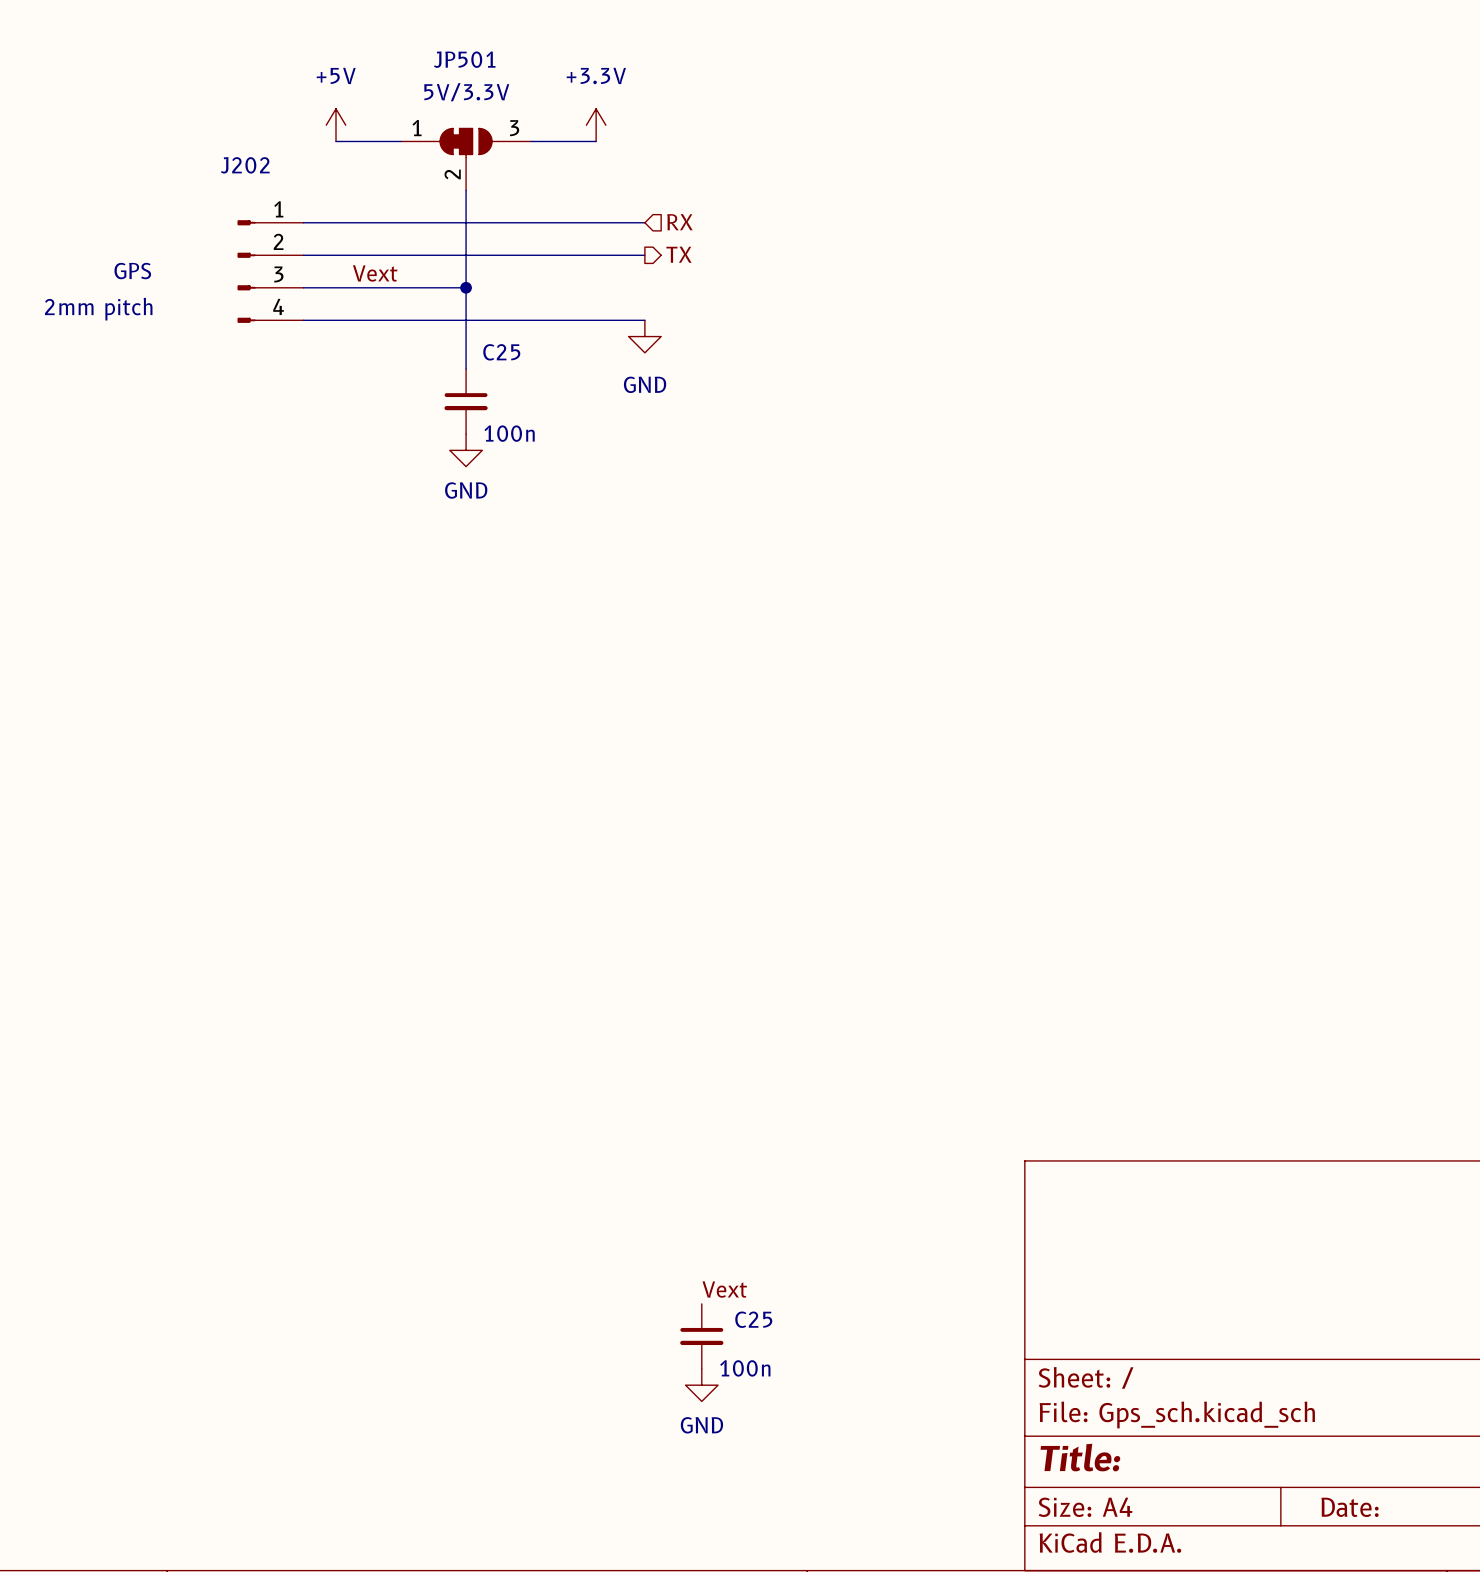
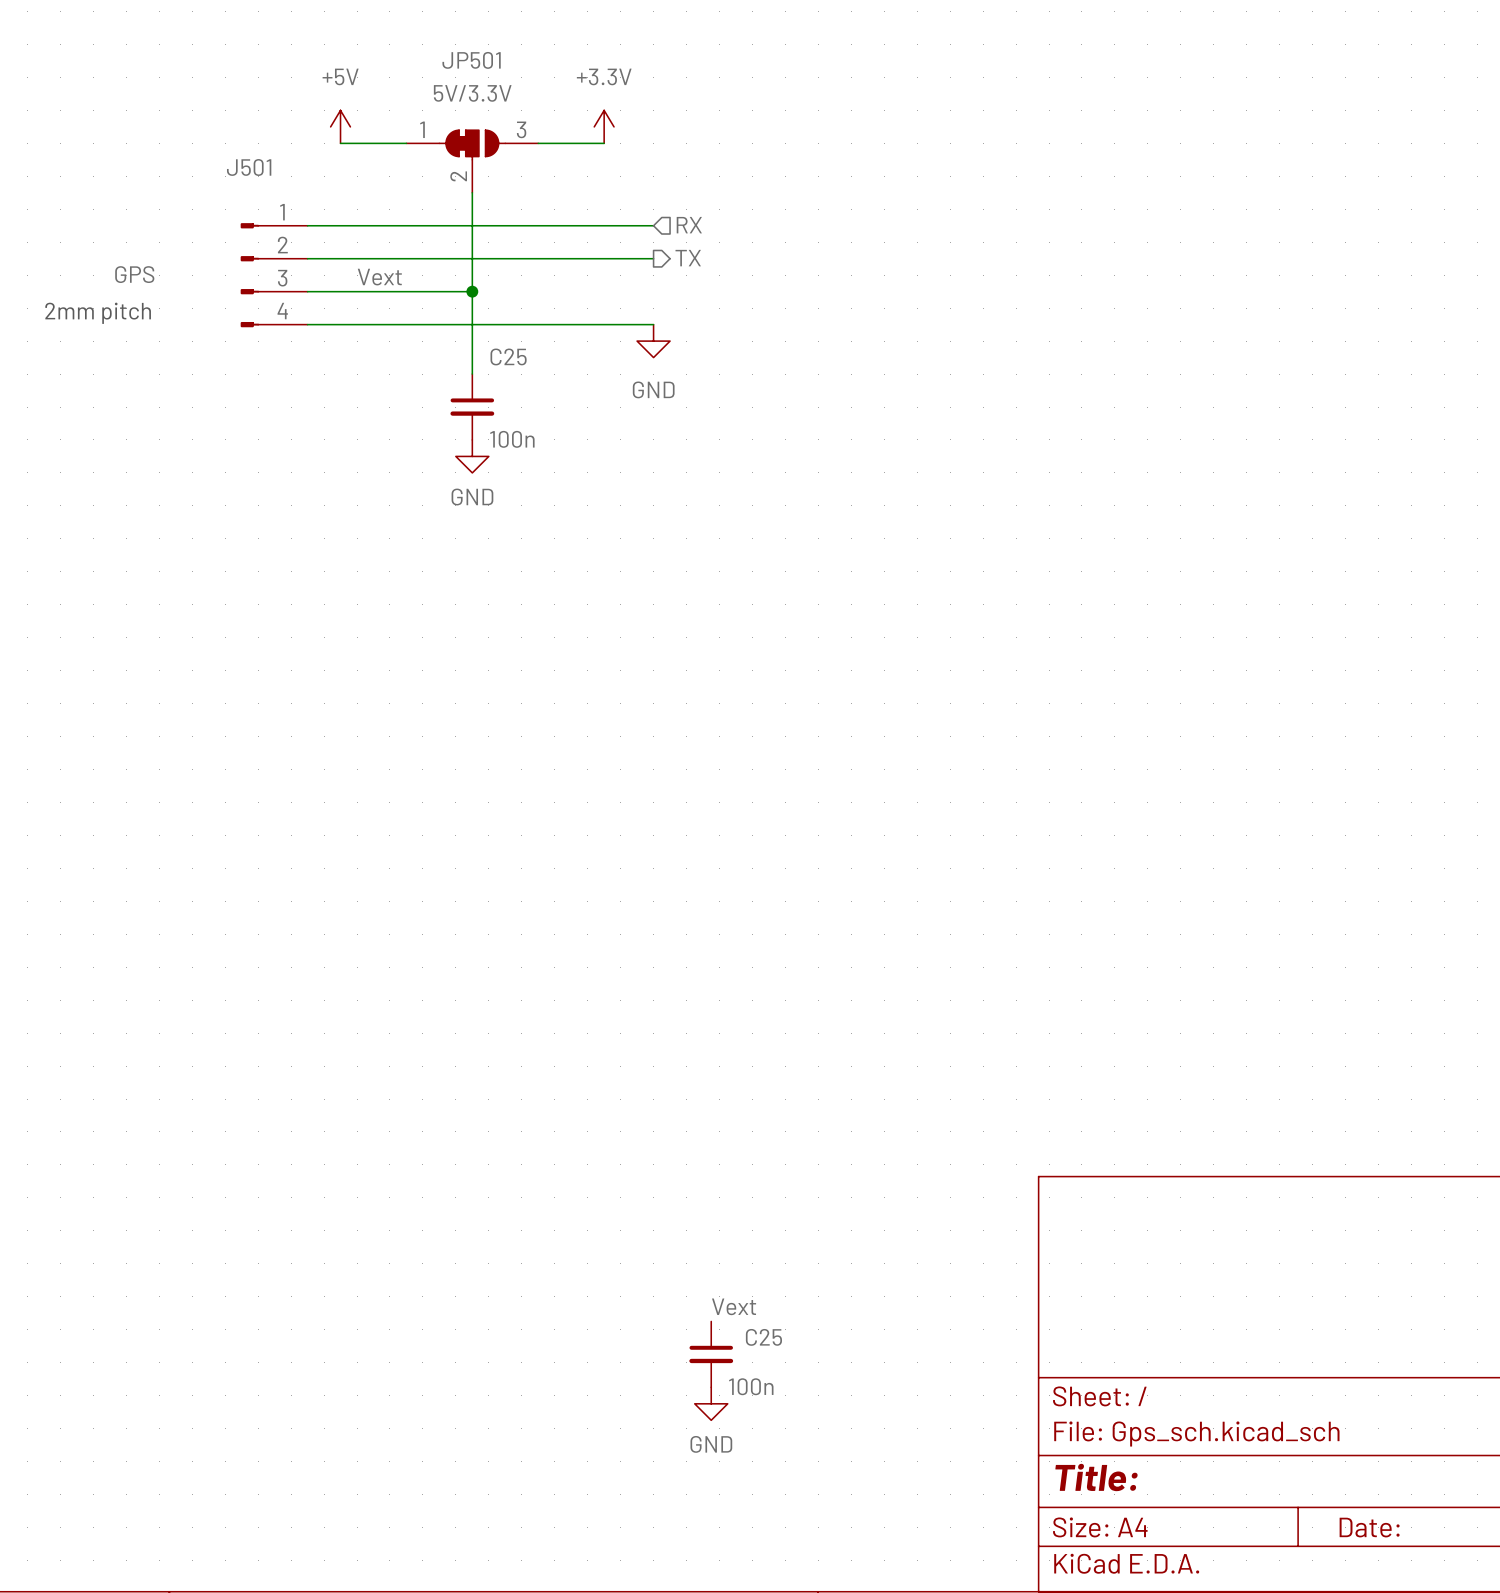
J202 name: J202 (245, 165) -> J501 (249, 167)

